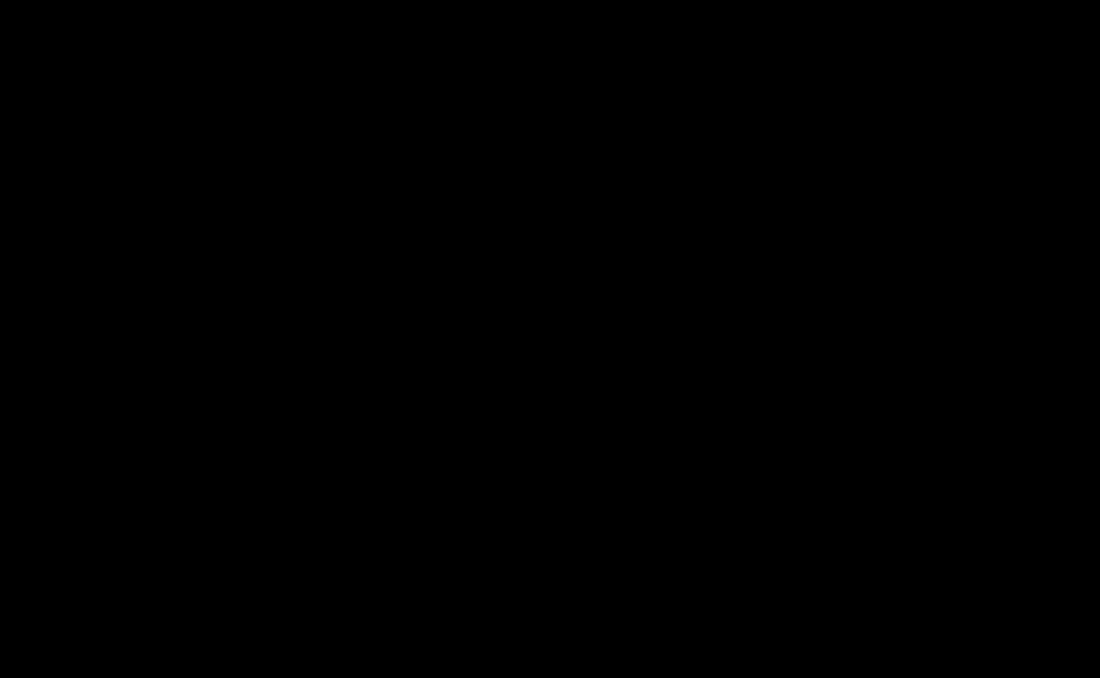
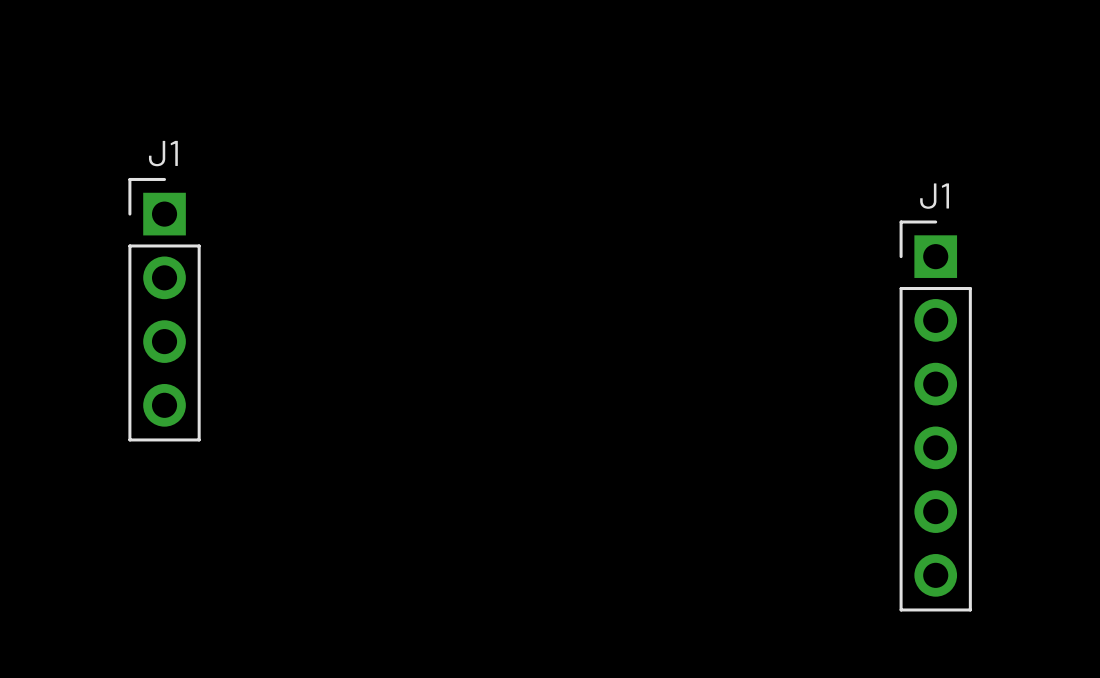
J1: none -> (164, 309)
J1: none -> (935, 415)

